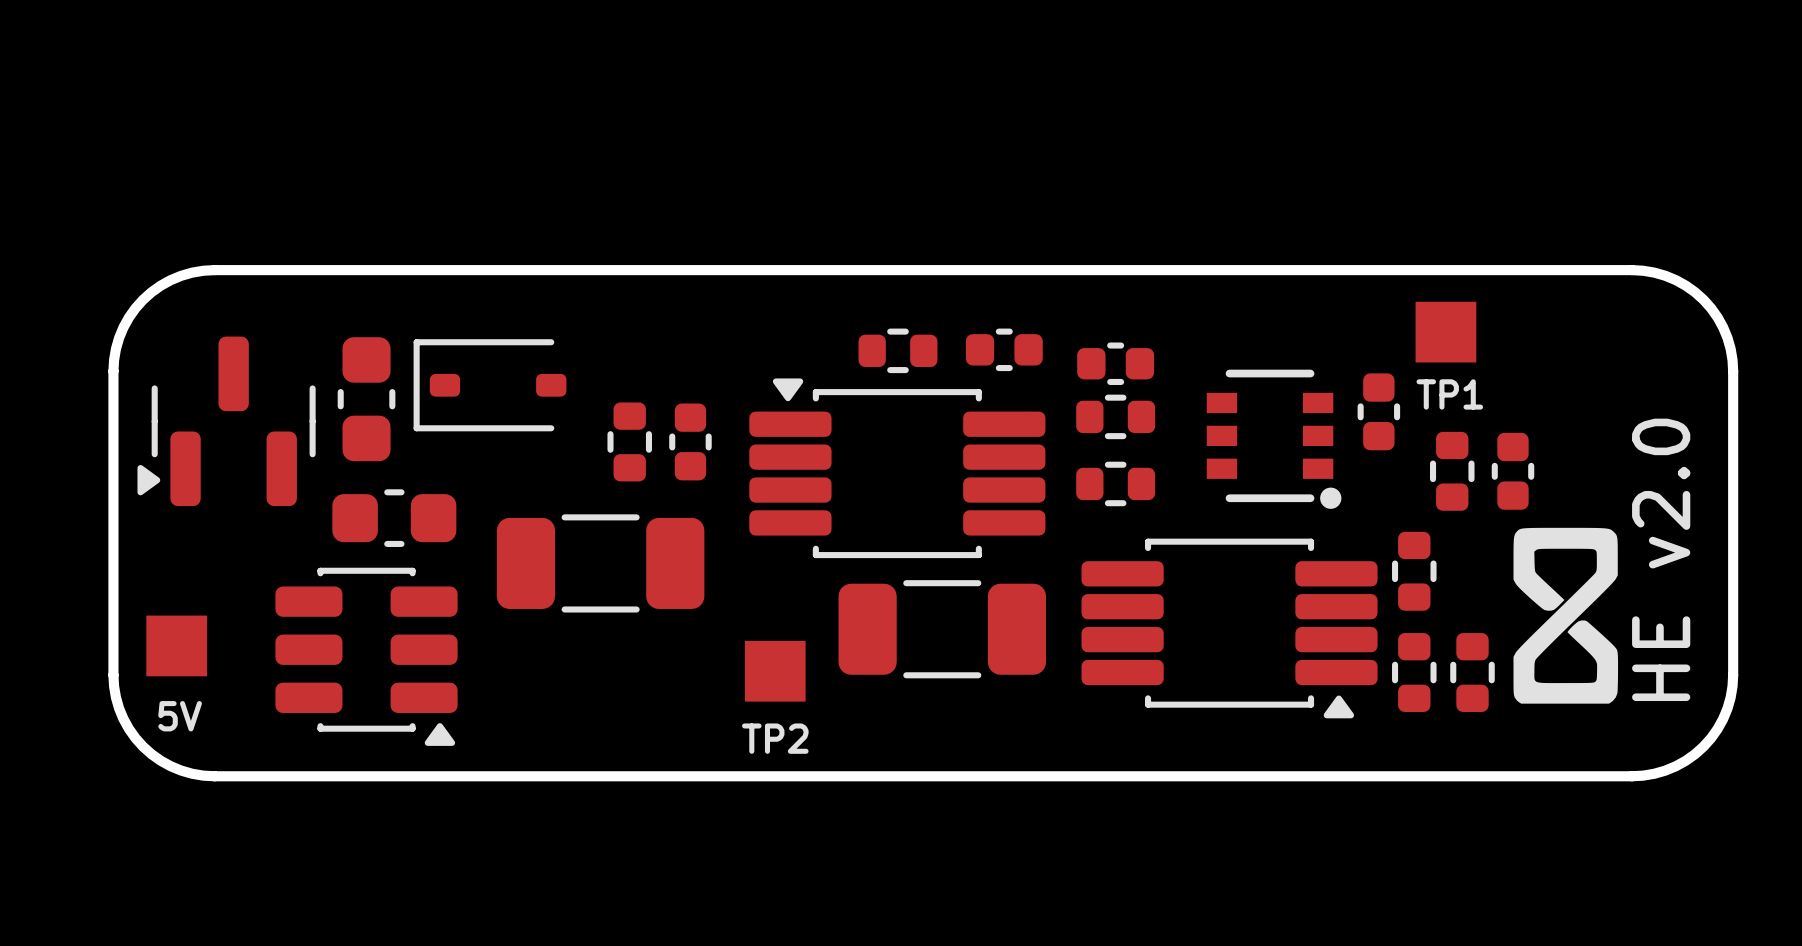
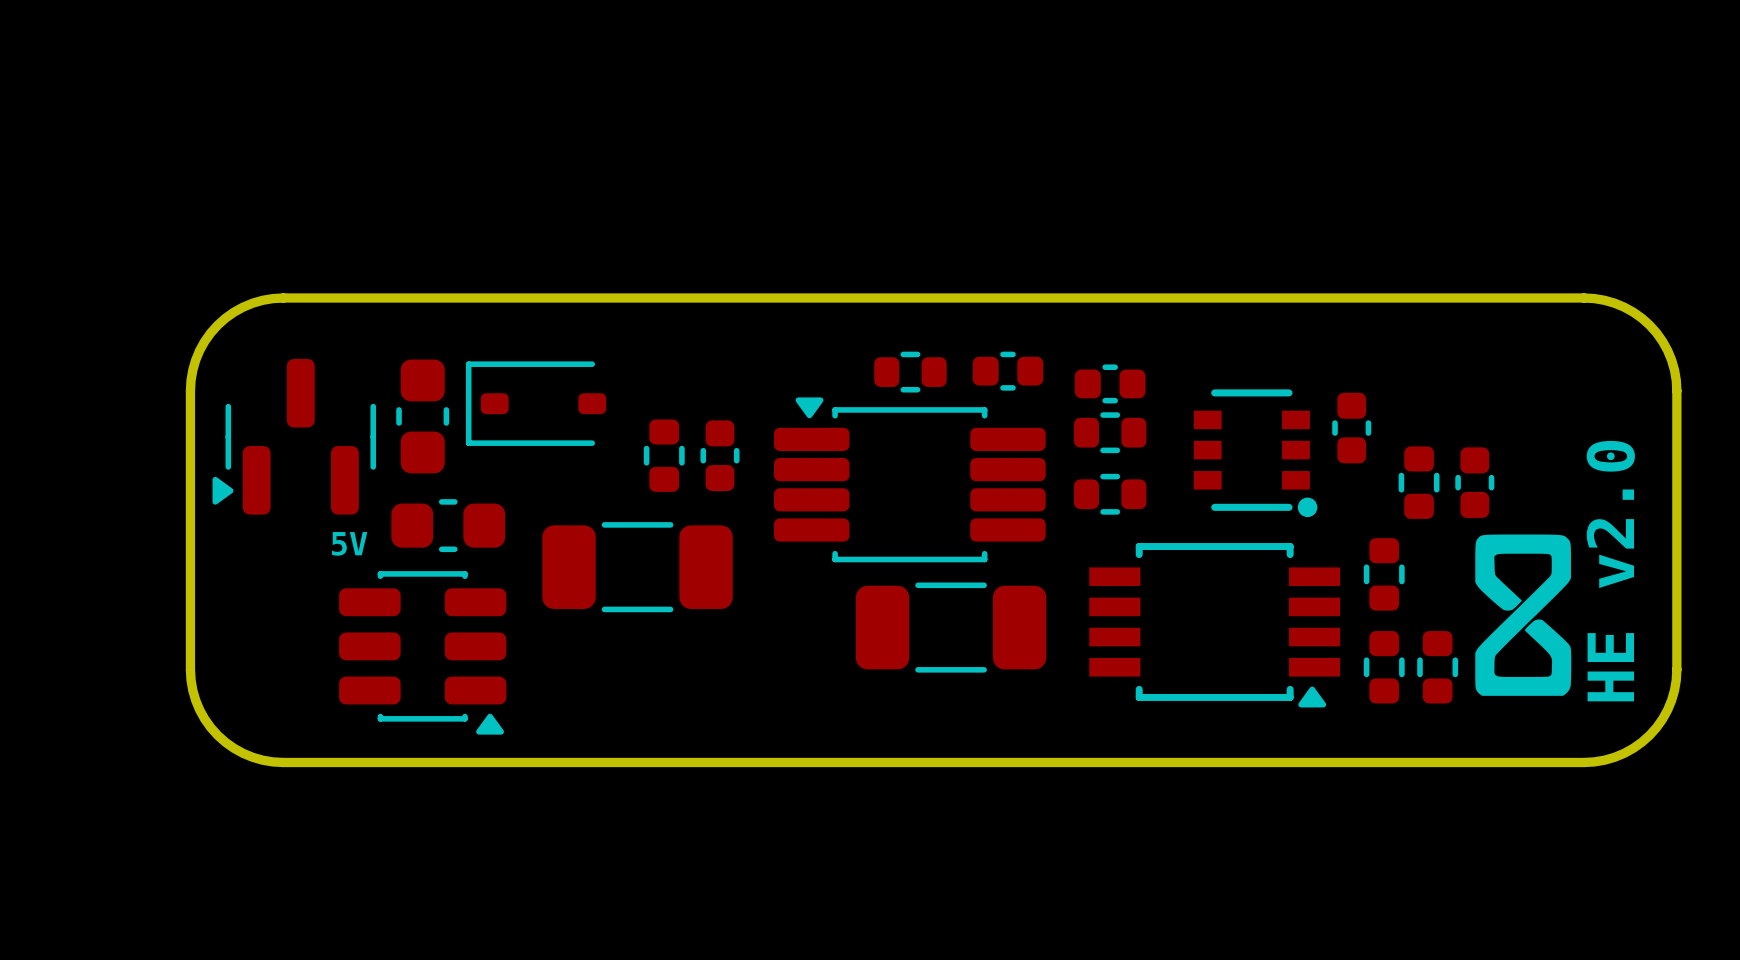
TP1: (1445, 332) -> none
part footprint: [1081, 538, 1378, 719] -> [1089, 543, 1341, 708]
part: (176, 645) -> none
TP2: (775, 671) -> none
text position: 5V (180, 716) -> 5V (349, 543)

